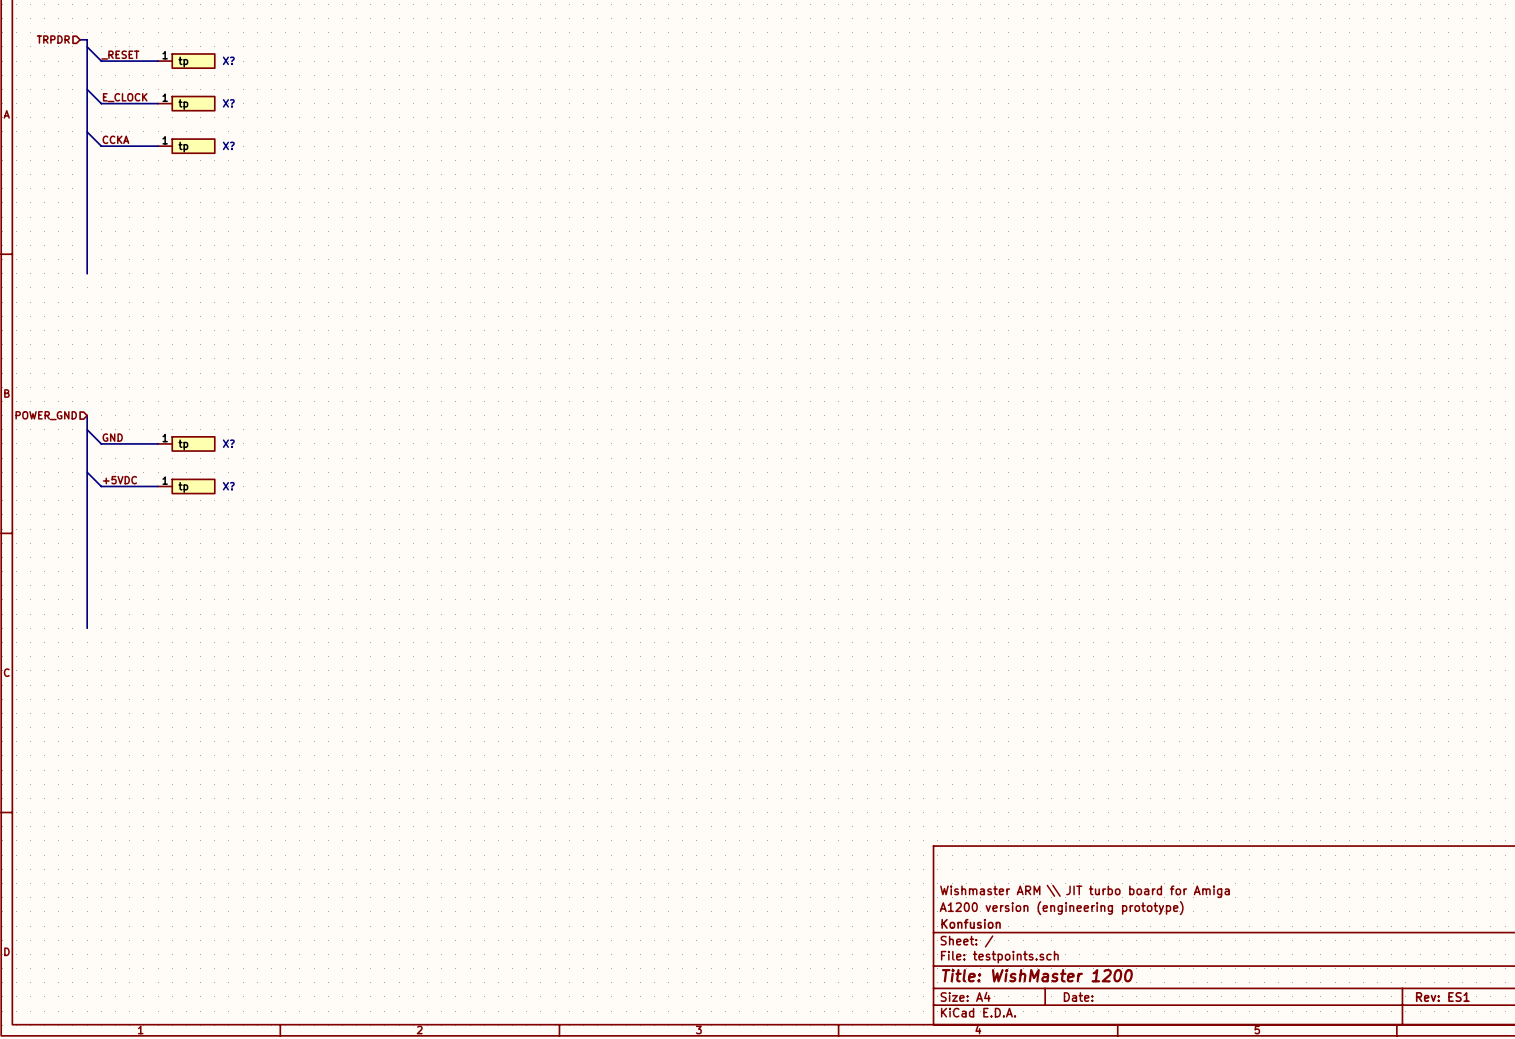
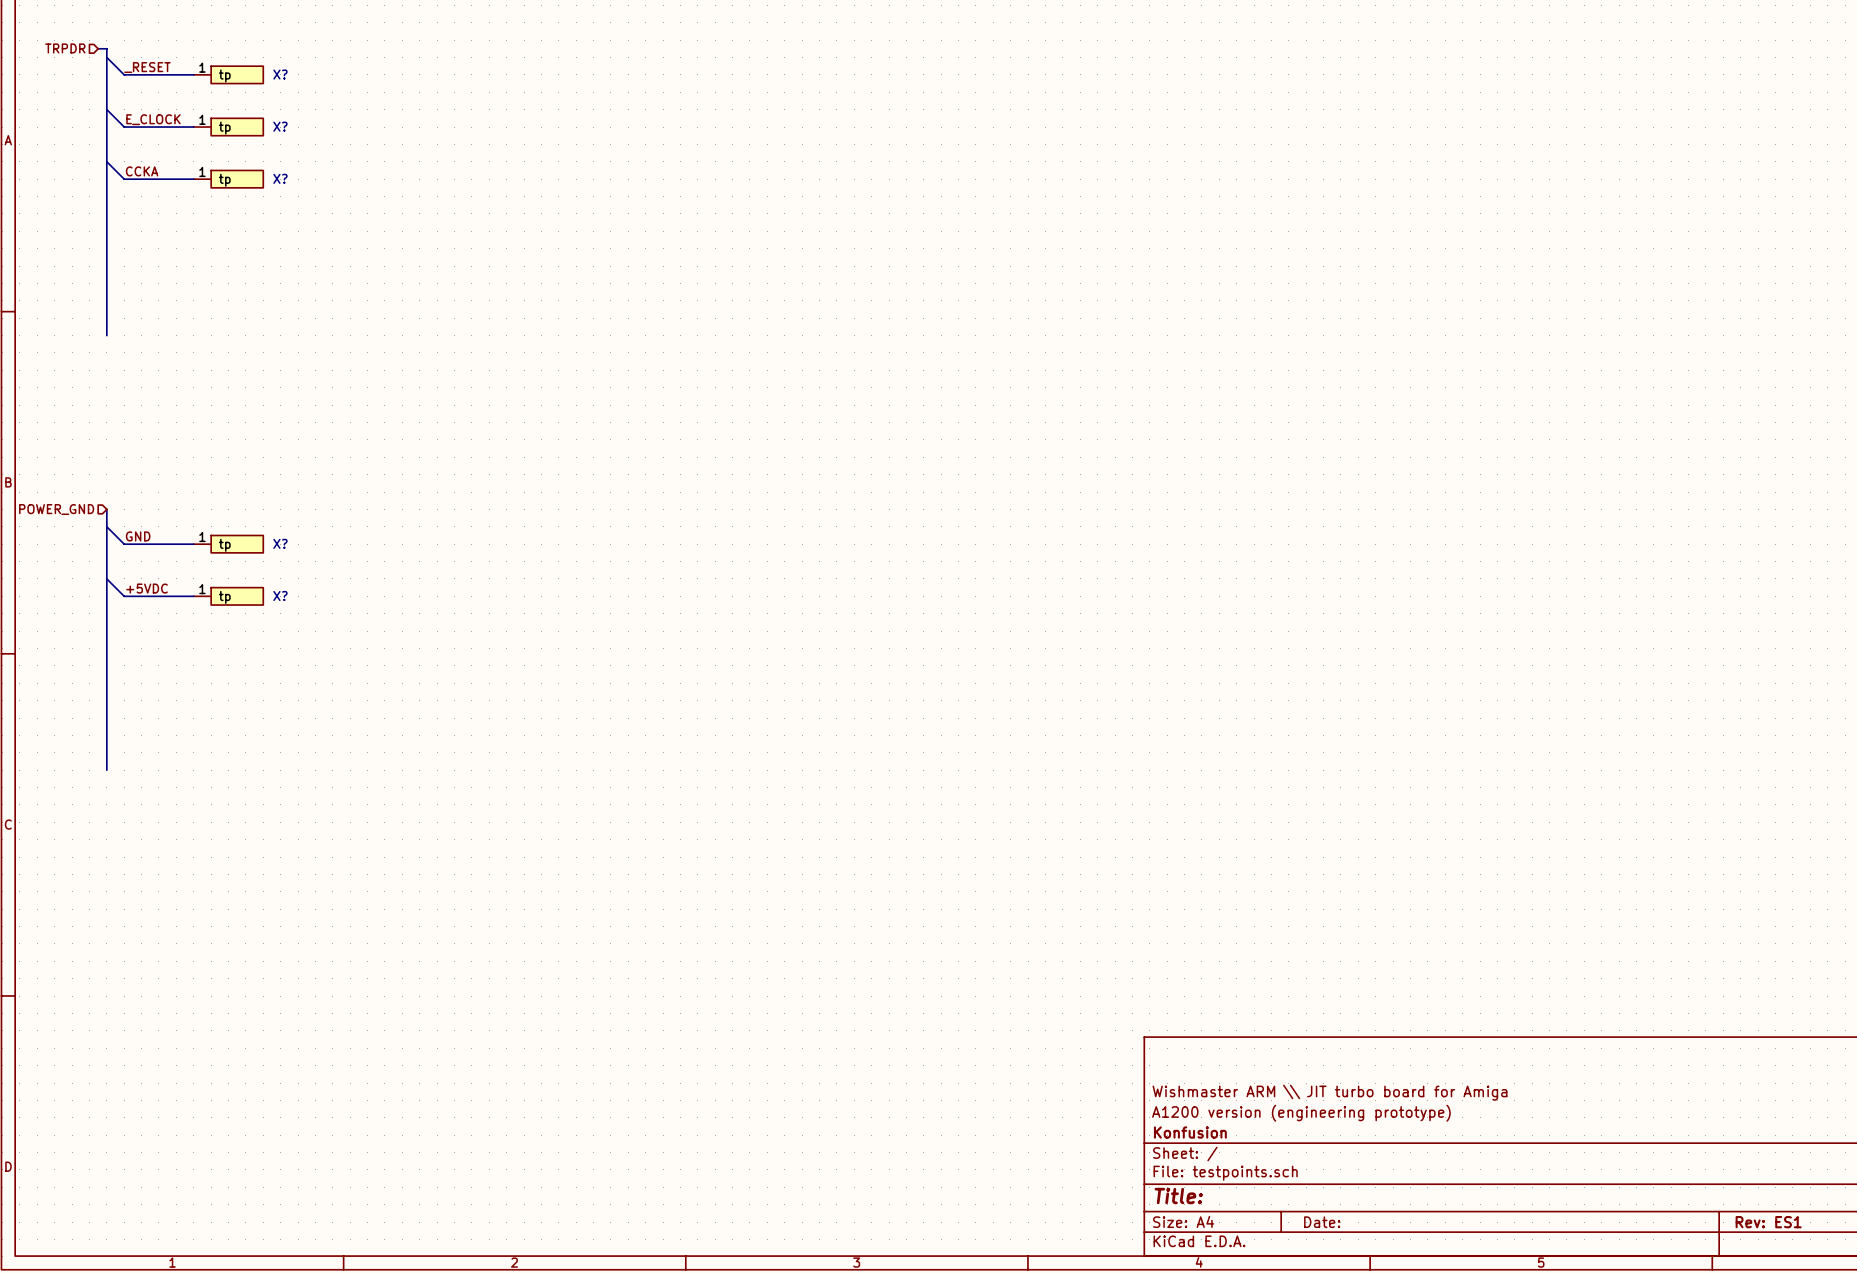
title block: Title: WishMaster 1200 (1037, 975) -> Title: (1178, 1196)

